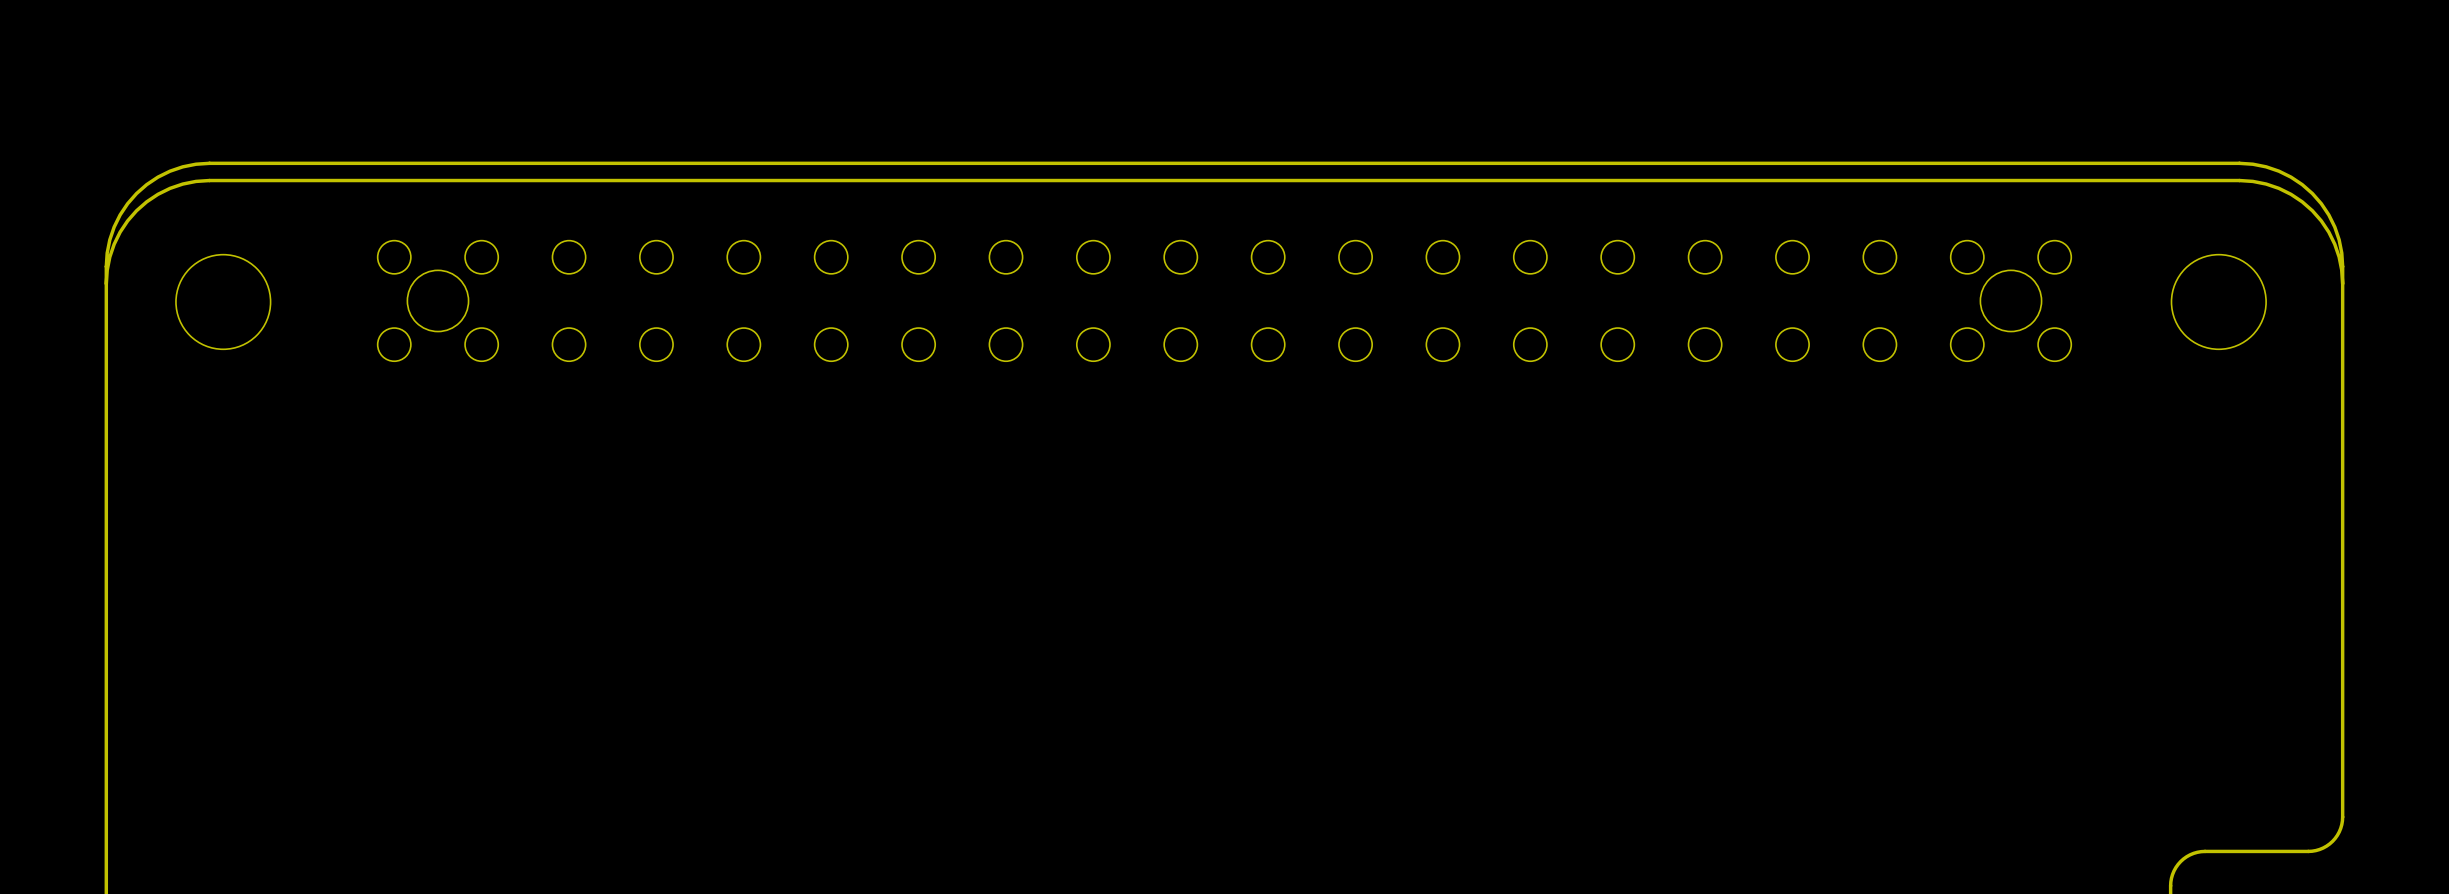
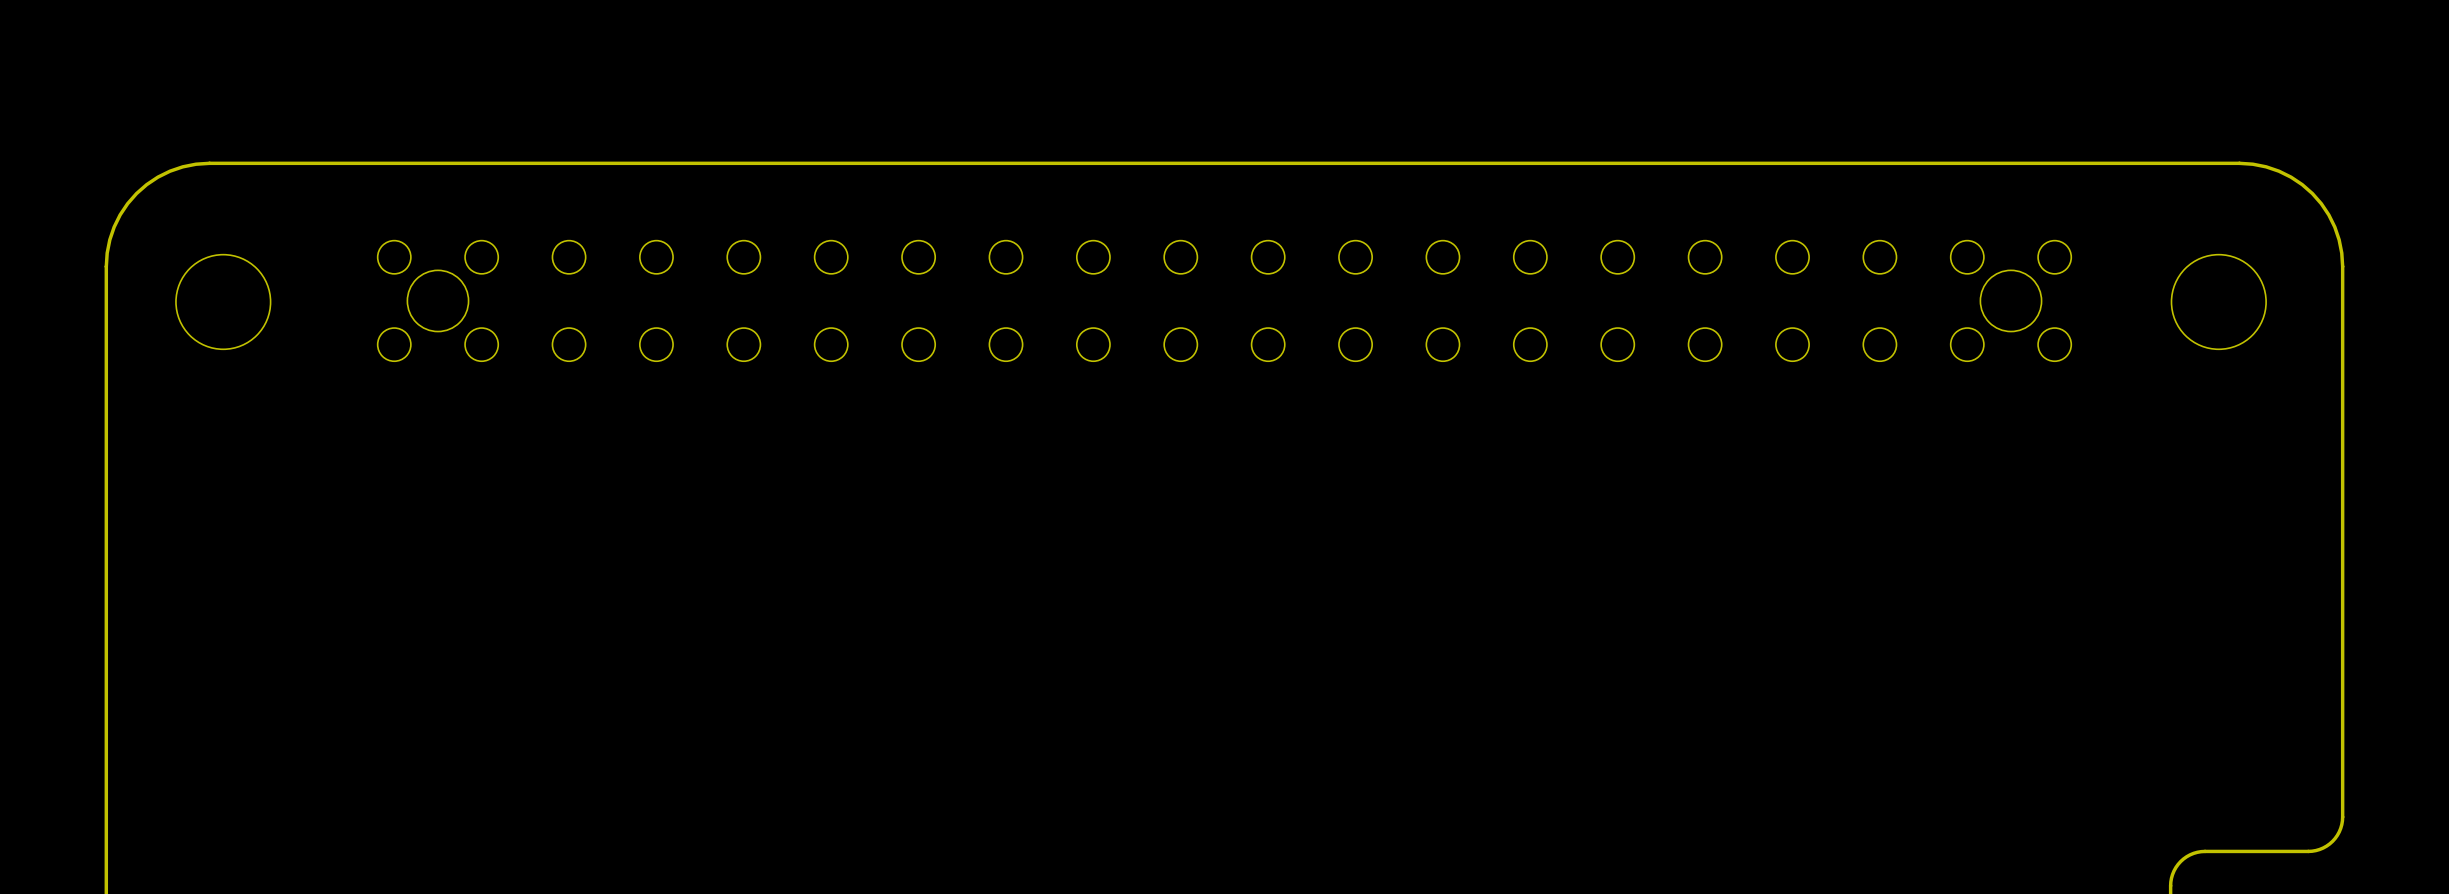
board edge: (2342, 283) (2341, 270) (2334, 244) (2321, 220) (2312, 210) (2302, 201) (2278, 188) (2266, 184) (2239, 180) (209, 180) (196, 181) (170, 188) (146, 201) (136, 210) (120, 232) (114, 244) (107, 270) (106, 283) -> none

